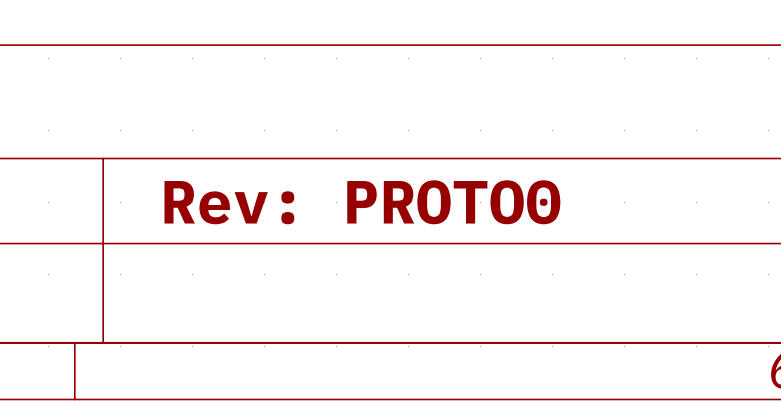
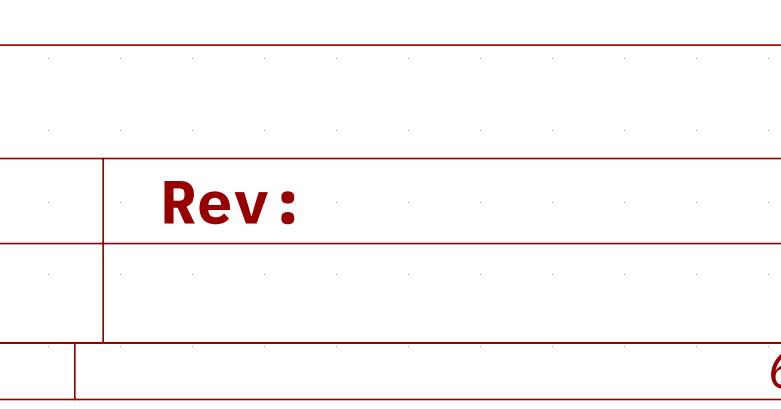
title block: Rev: PROTO0 (362, 202) -> Rev: (229, 202)

